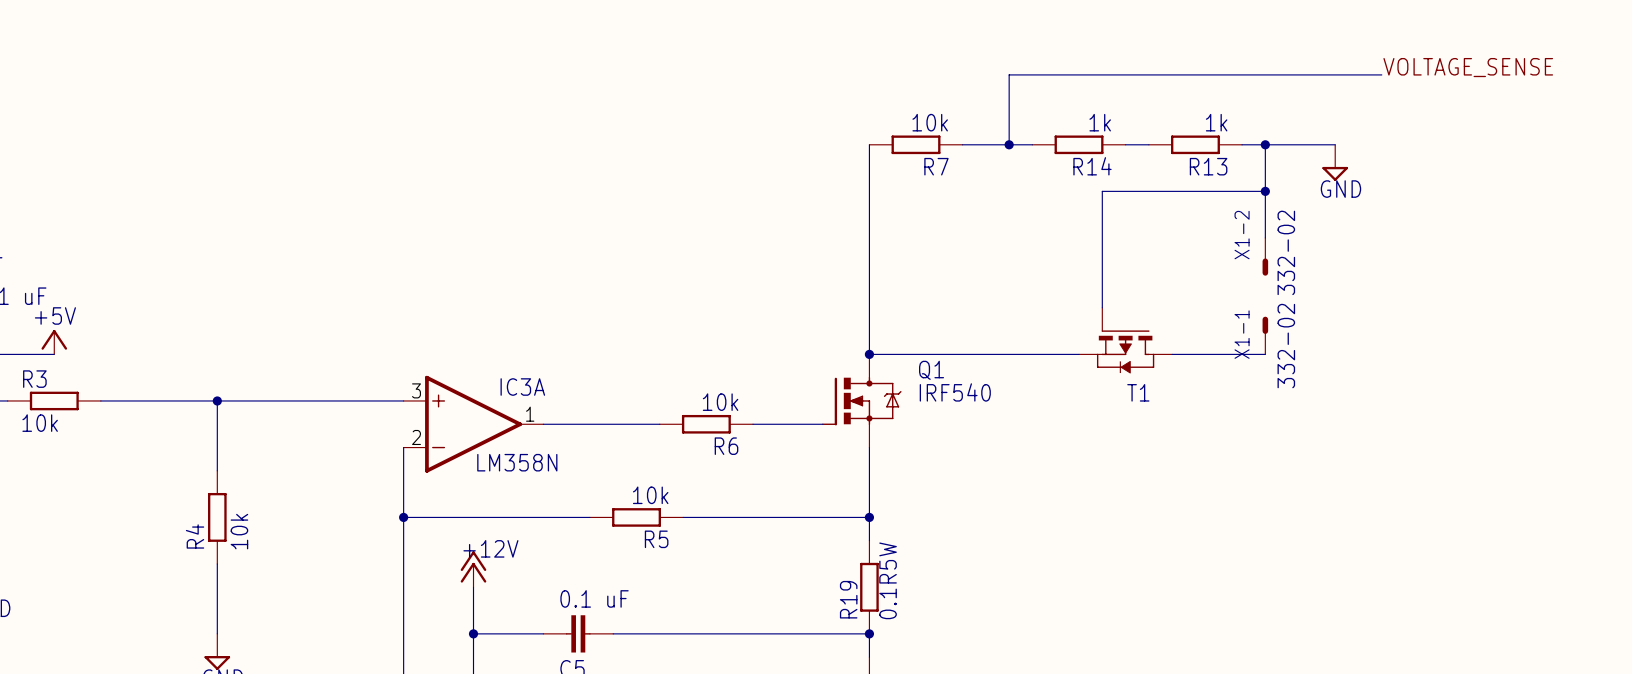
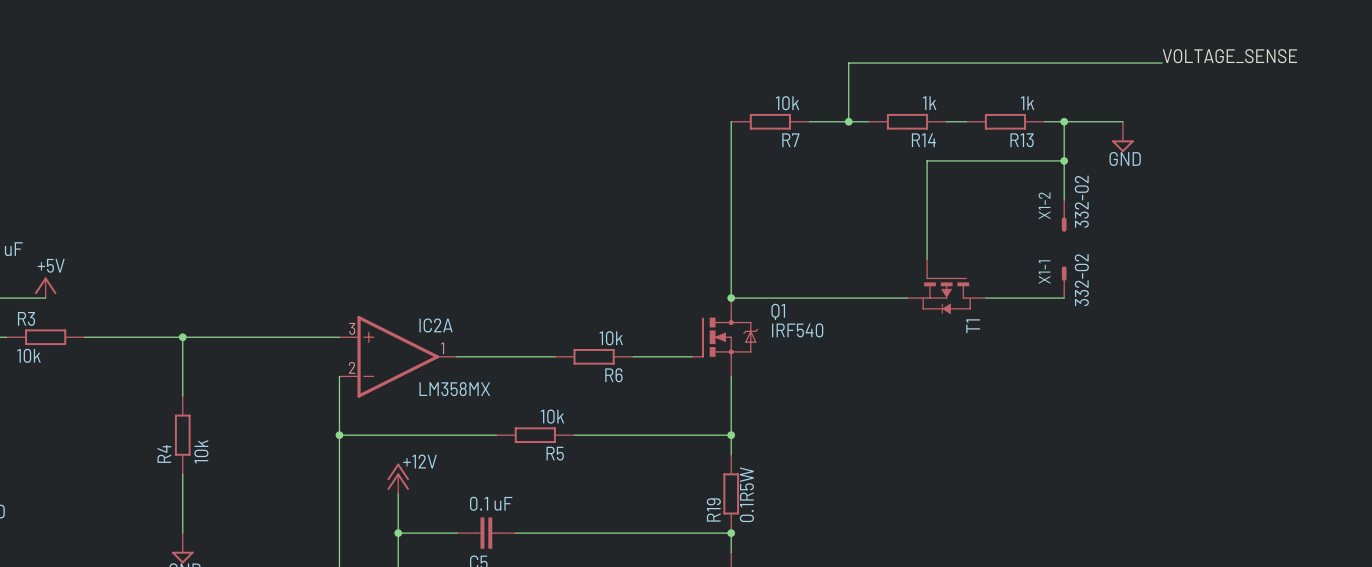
IC3A name: IC3A (522, 387) -> IC2A (436, 325)
T1 name rotation: 0° (1138, 392) -> 90° counterclockwise (973, 326)
IC3A value: LM358N (517, 462) -> LM358MX (454, 389)

